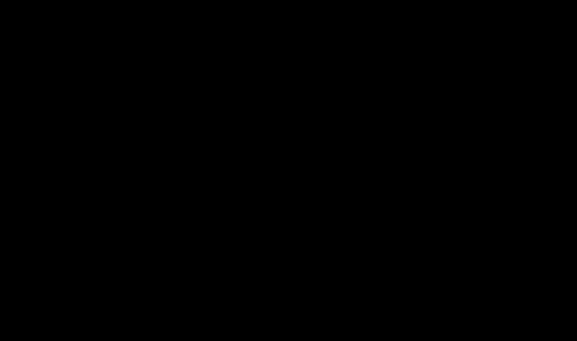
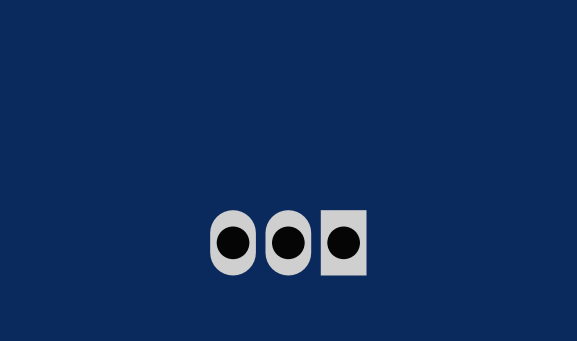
part: none -> (288, 242)

